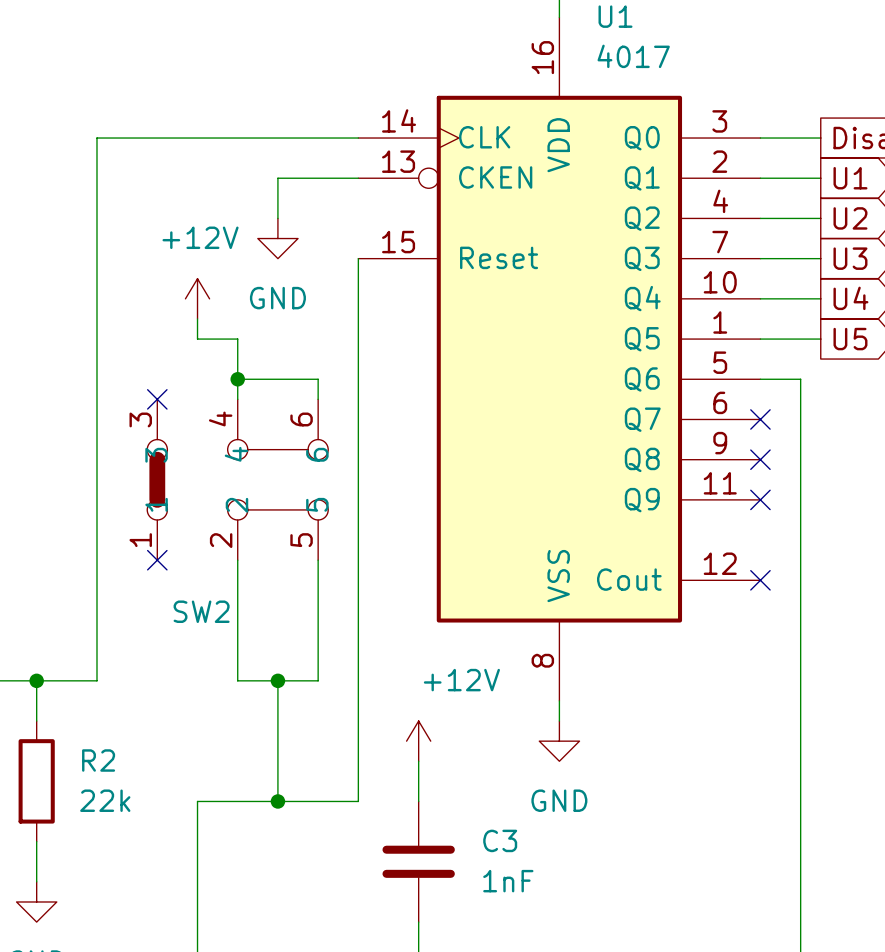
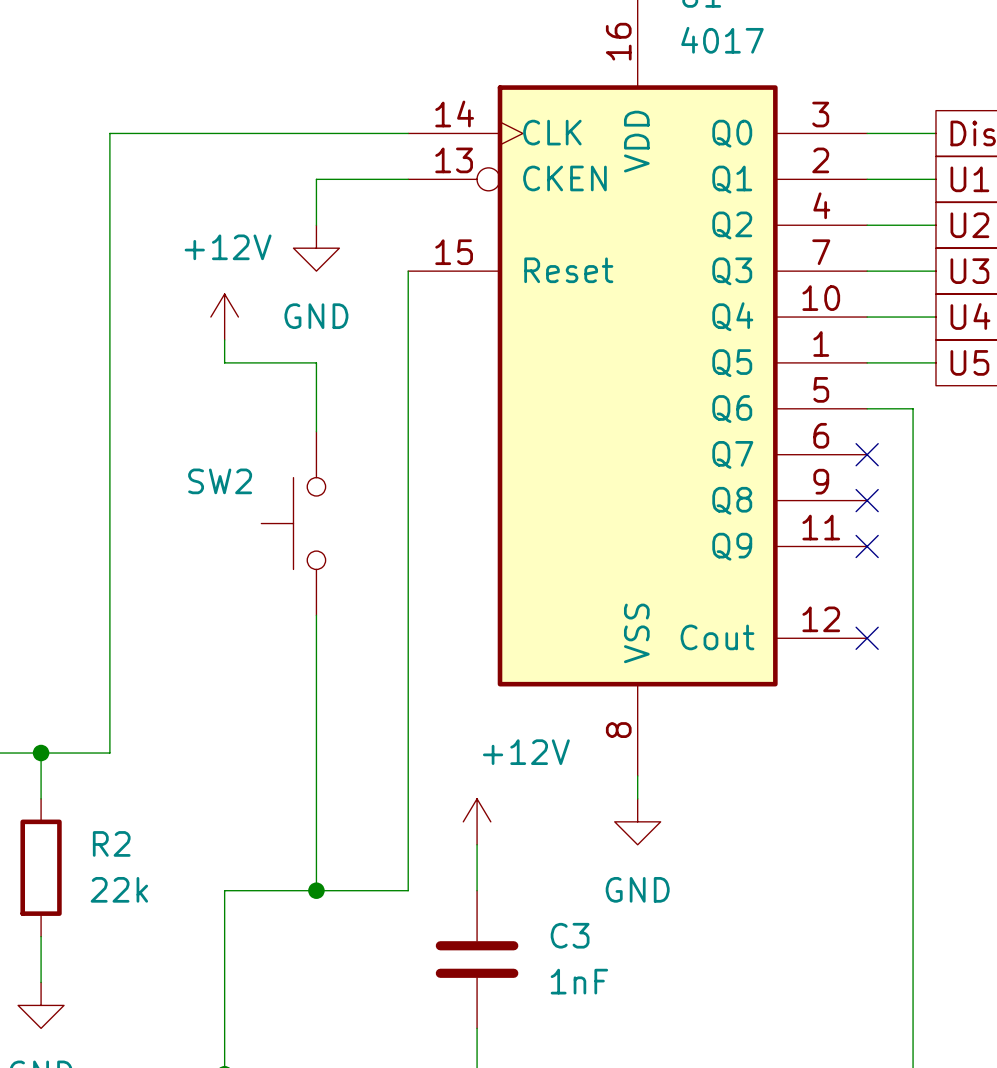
wire: (237, 339) (237, 399) -> (270, 362) (316, 362) (316, 431)
wire: (237, 379) (318, 379) (318, 399) -> none
junction: (237, 379) -> none
SW2 symbol: [147, 399, 329, 561] -> [261, 431, 326, 616]
no-connect mark: (157, 399) -> none
no-connect mark: (157, 560) -> none
wire: (237, 560) (237, 680) (318, 680) (318, 560) -> none
wire: none -> (316, 615) (316, 753)
SW2 name position: SW2 (201, 611) -> SW2 (220, 481)
junction: (277, 680) -> none

